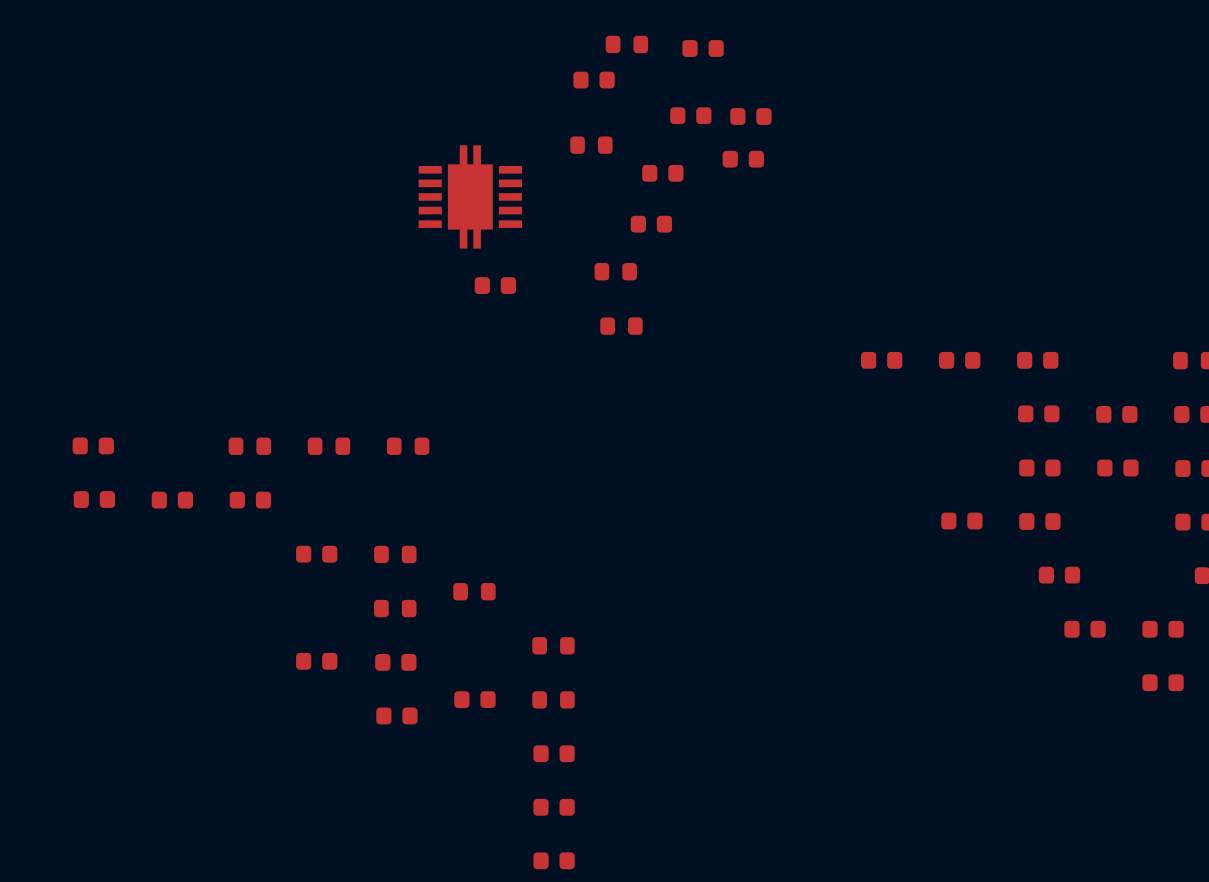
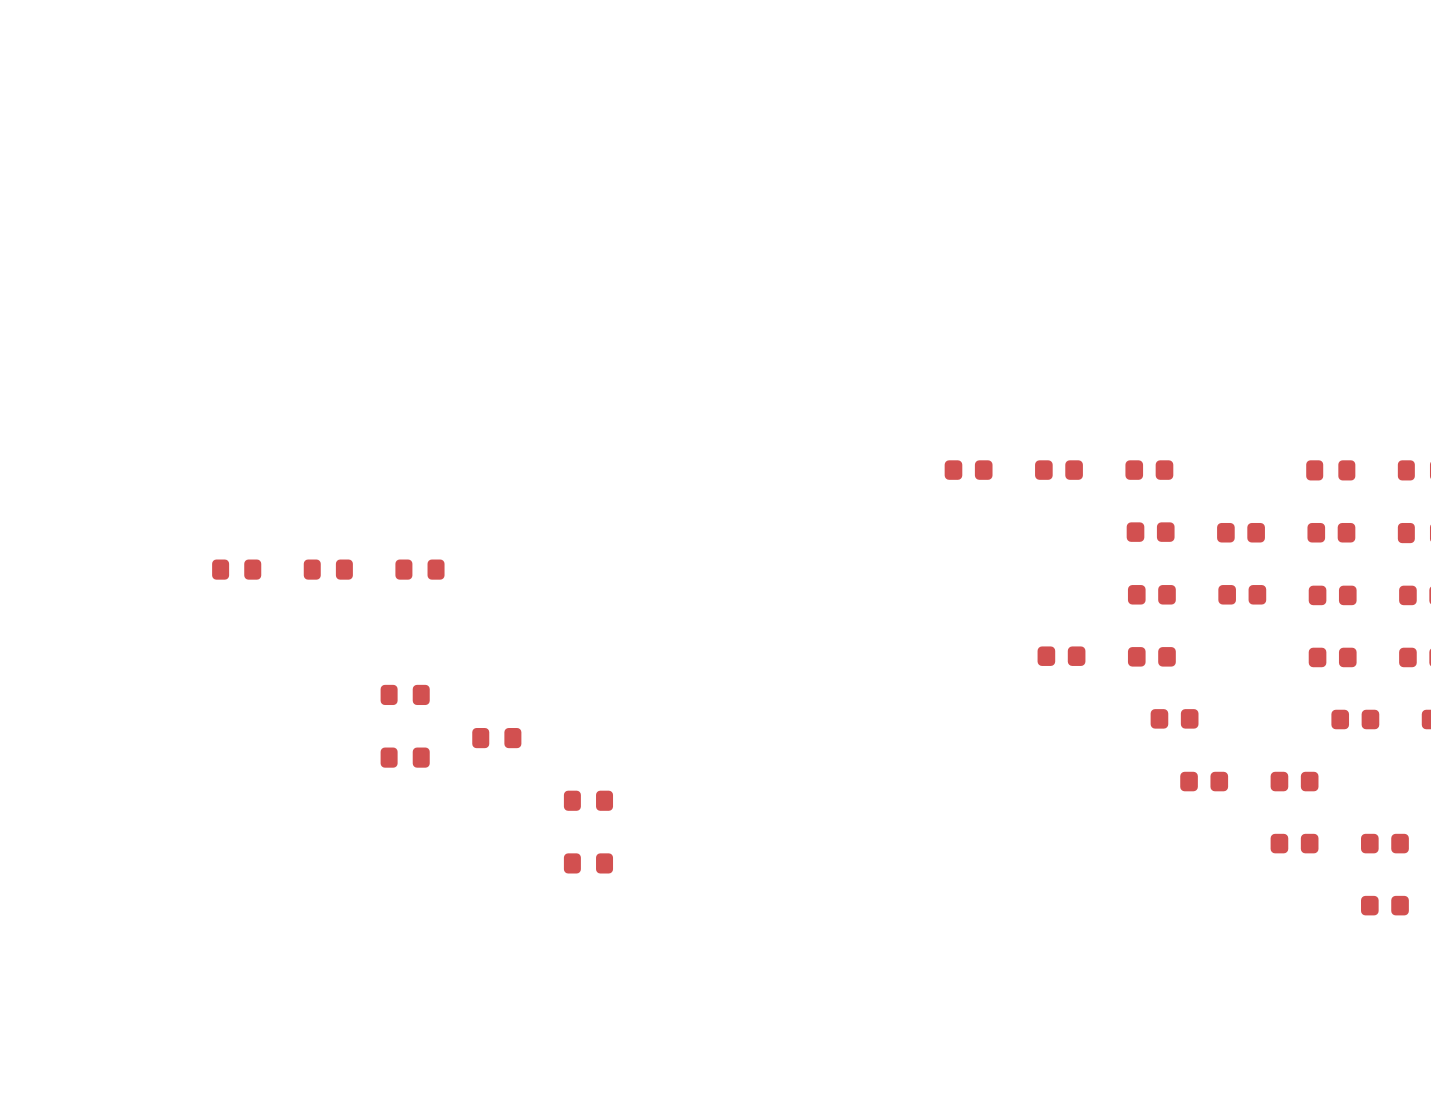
part: (626, 44) -> none
part: (703, 48) -> none
part: (594, 80) -> none
part: (690, 115) -> none
part: (750, 116) -> none
part: (591, 145) -> none
part: (743, 159) -> none
part: (662, 173) -> none
part: (470, 196) -> none
part: (651, 224) -> none
part: (615, 271) -> none
part: (495, 285) -> none
part: (621, 326) -> none
part: (93, 445) -> none
part: (94, 499) -> none
part: (172, 500) -> none
part: (250, 500) -> none
part: (316, 554) -> none
part: (316, 661) -> none
part: (395, 662) -> none
part: (474, 699) -> none
part: (396, 715) -> none
part: (554, 753) -> none
part: (554, 807) -> none
part: (554, 860) -> none

